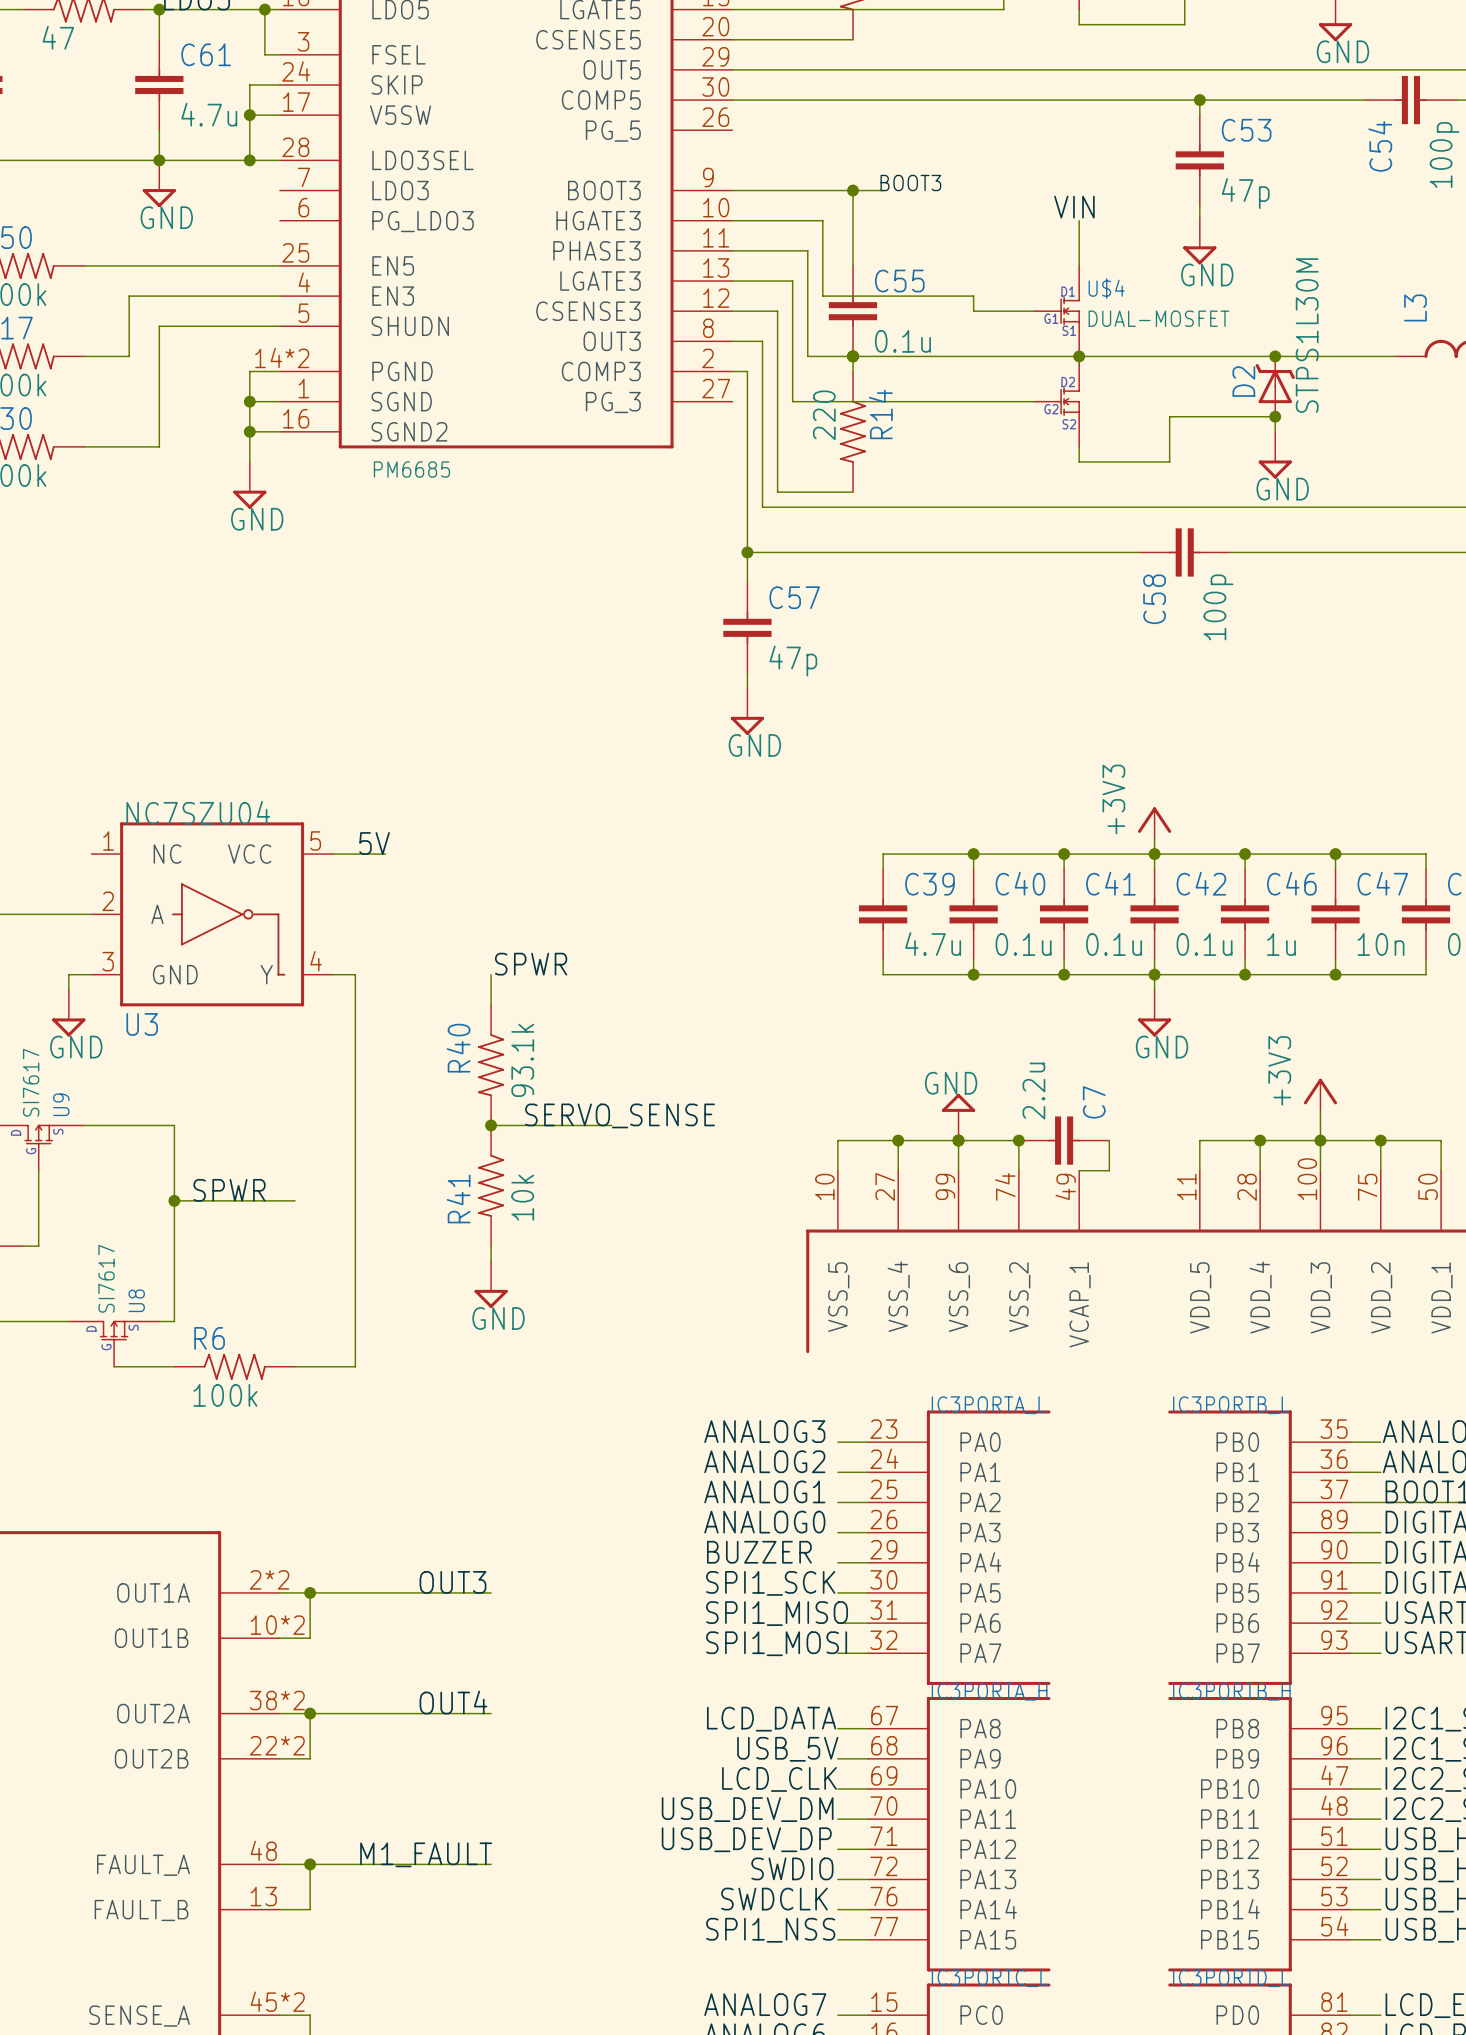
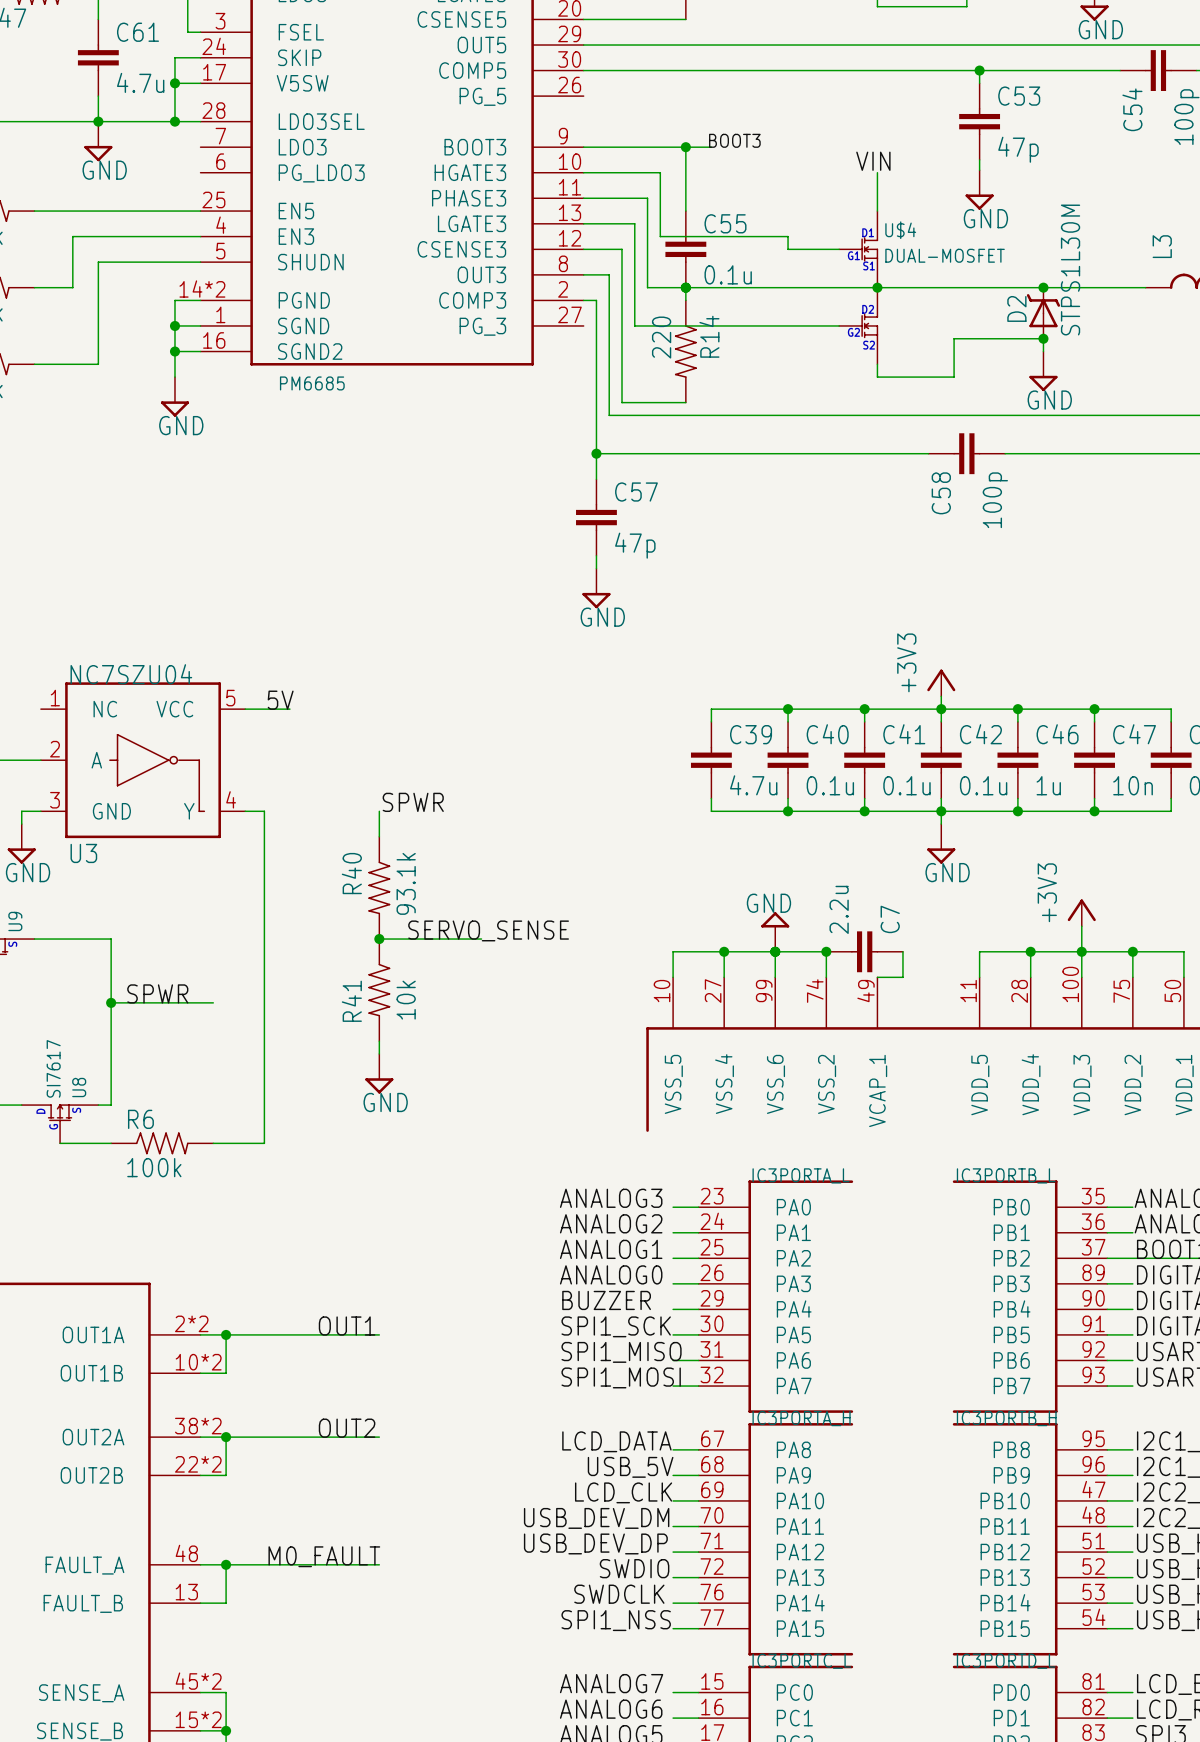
label: OUT3 (452, 1582) -> OUT1 (347, 1326)
label: OUT4 (453, 1702) -> OUT2 (347, 1428)
label: M1_FAULT (426, 1854) -> M0_FAULT (324, 1556)

